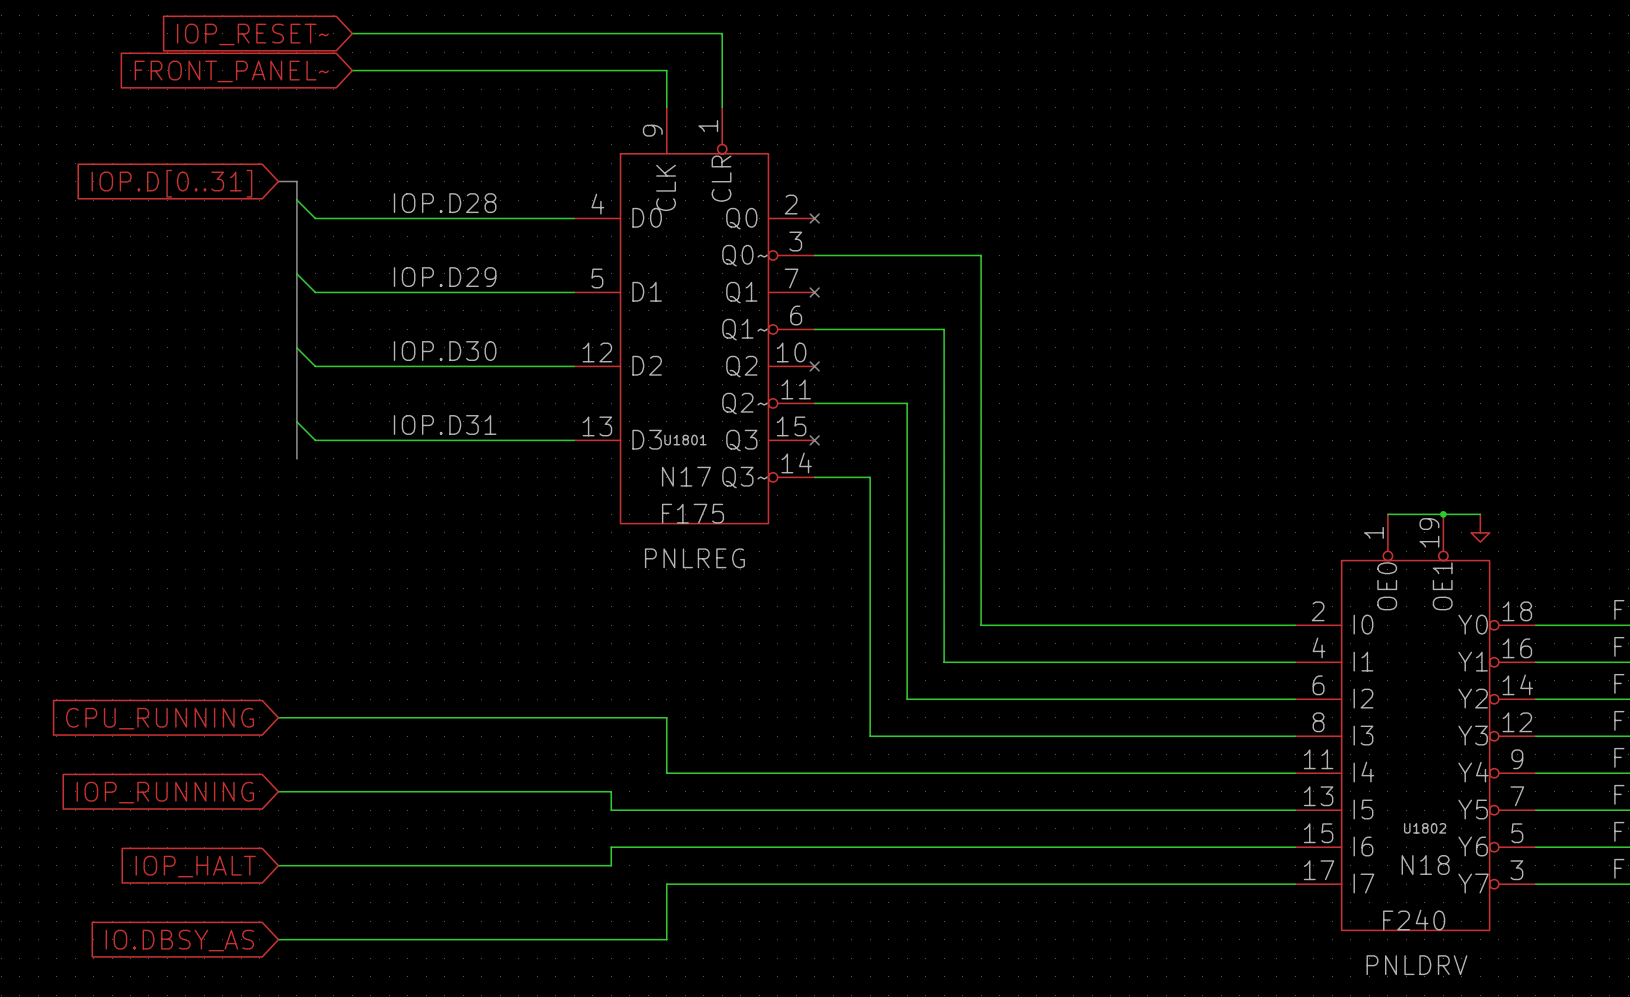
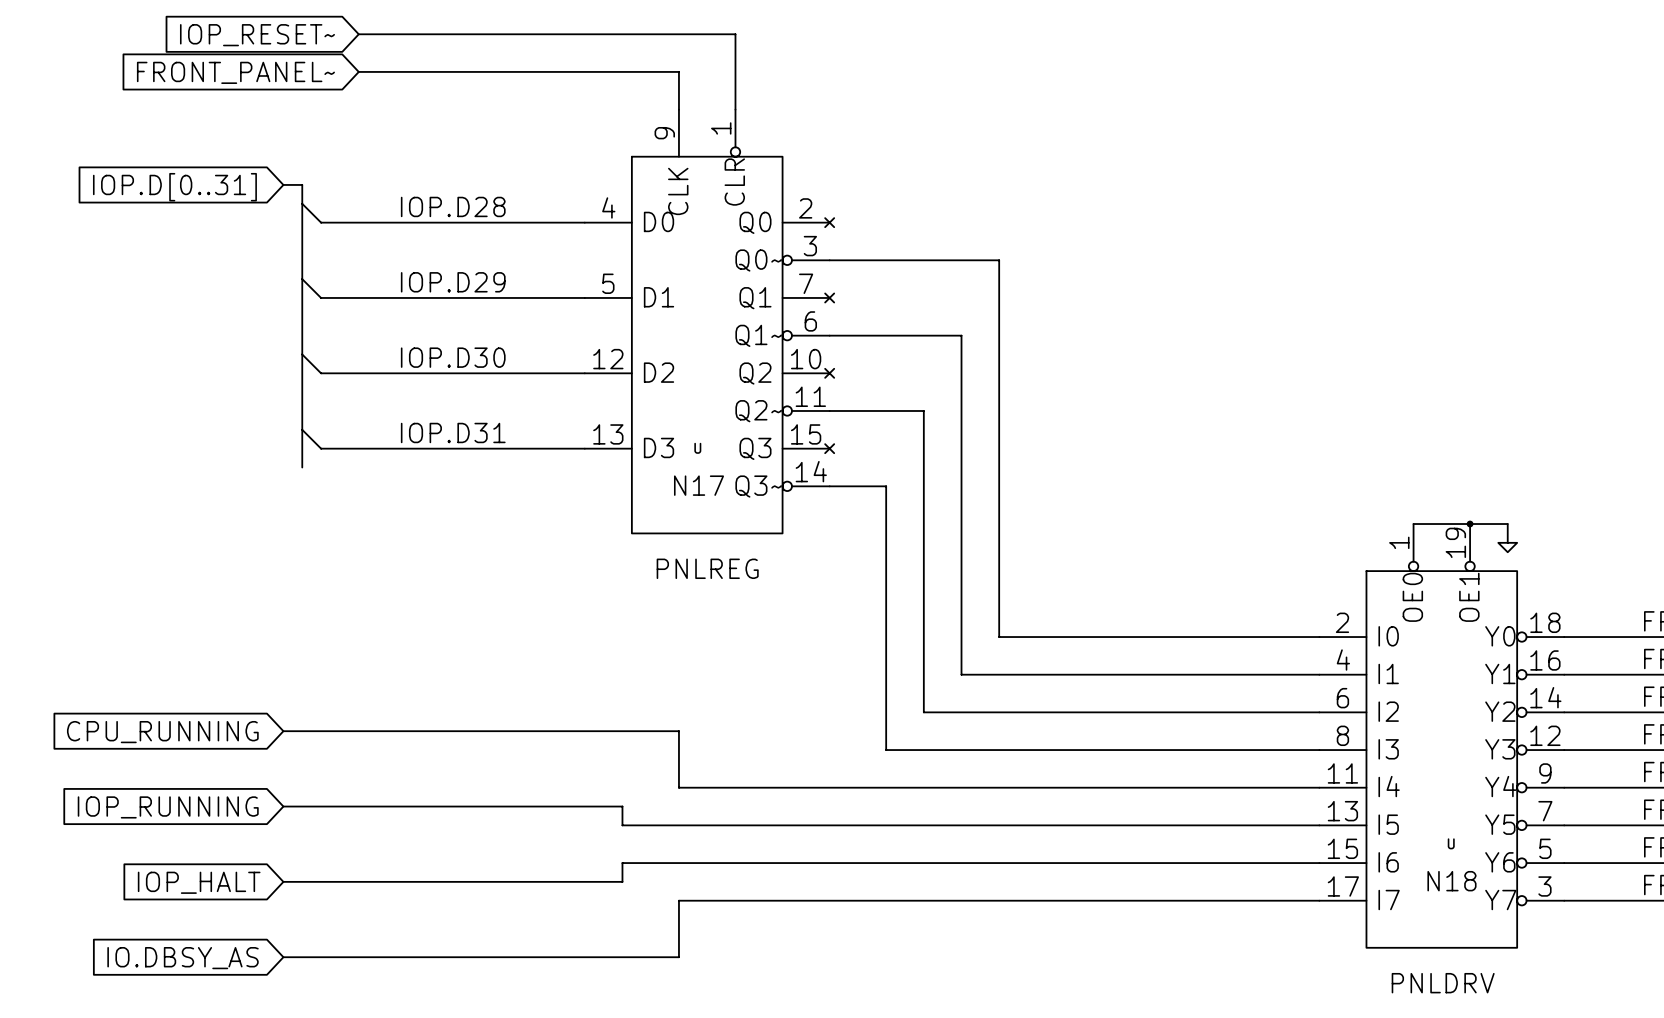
U1801 name: U1801 (685, 440) -> U (697, 448)
U1801 value: F175 (693, 513) -> none
U1802 name: U1802 (1425, 828) -> U (1451, 843)
U1802 value: F240 (1414, 920) -> none

